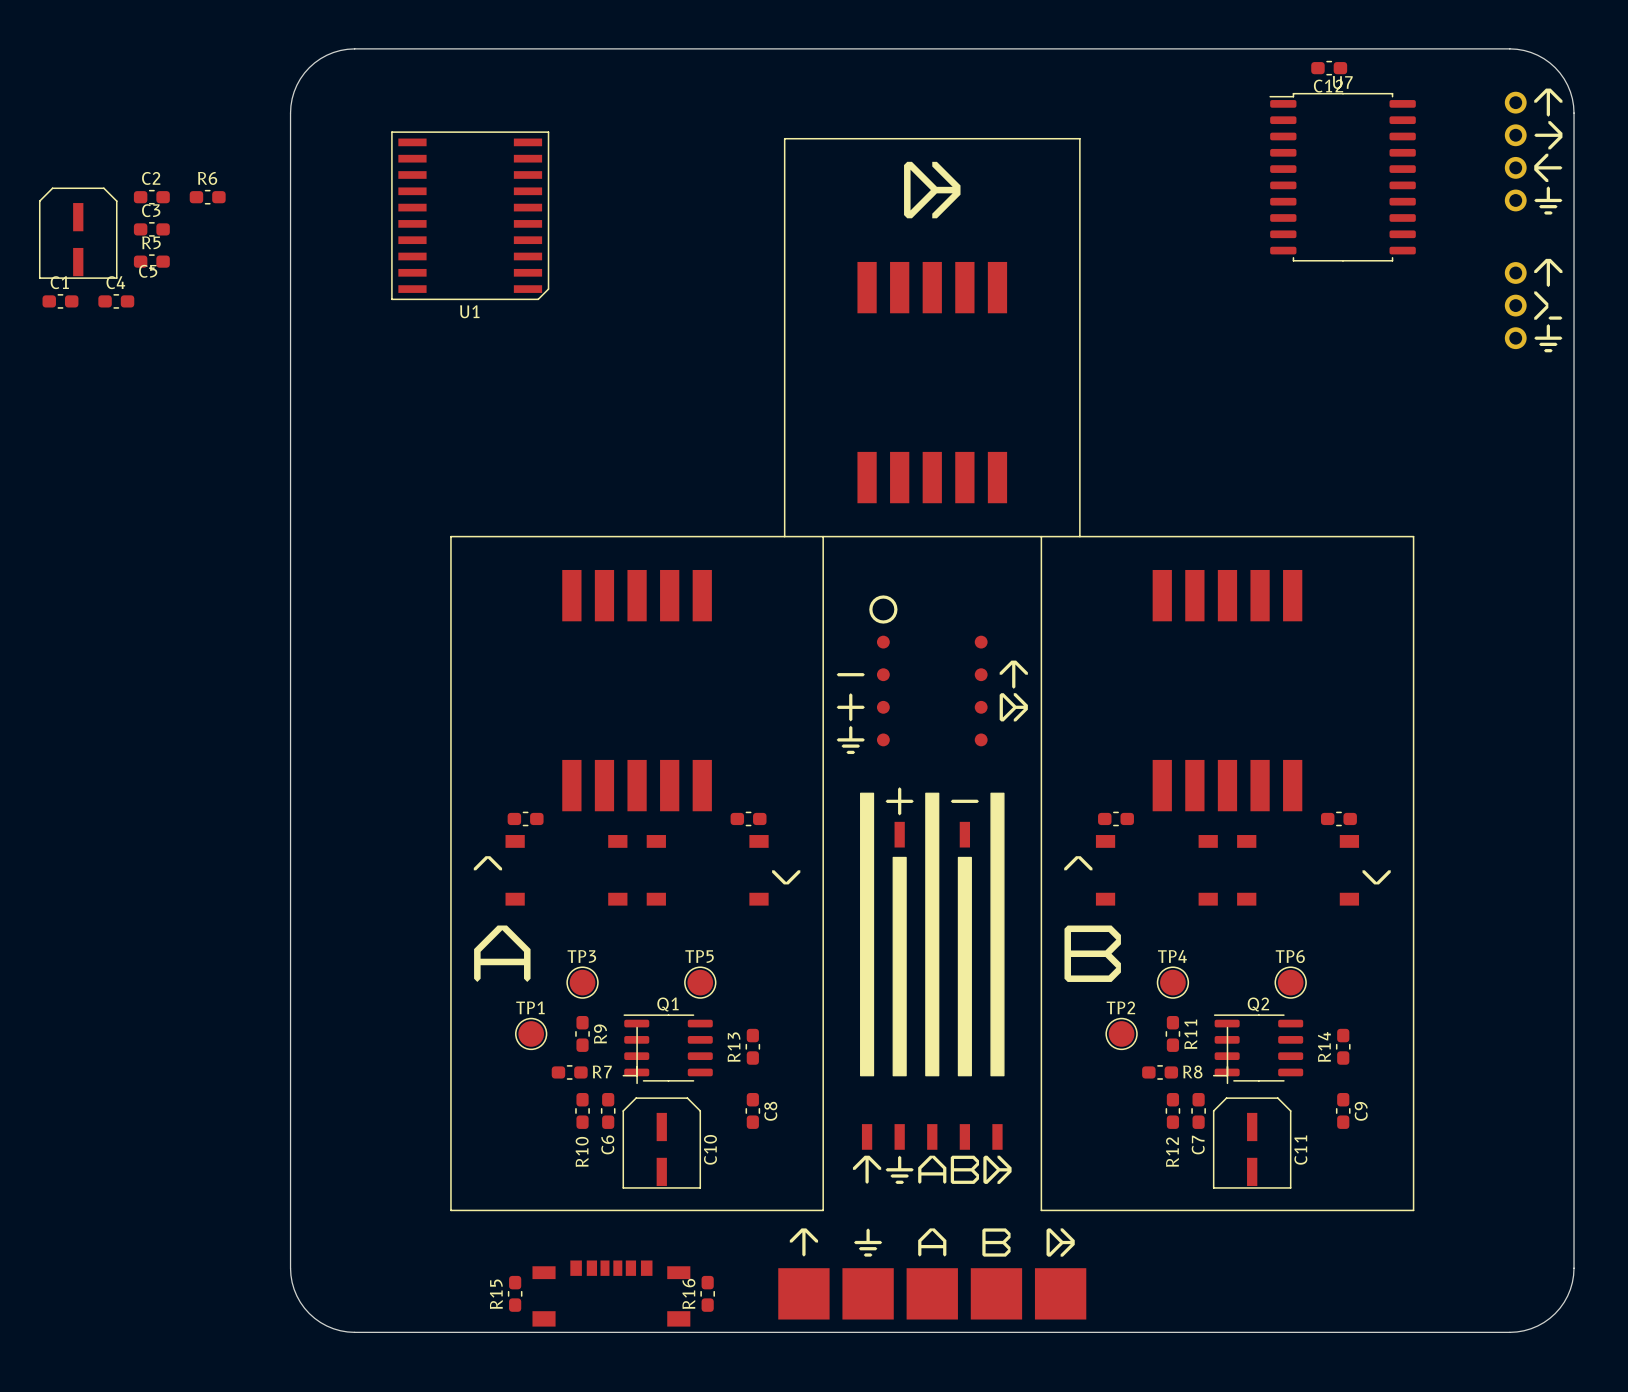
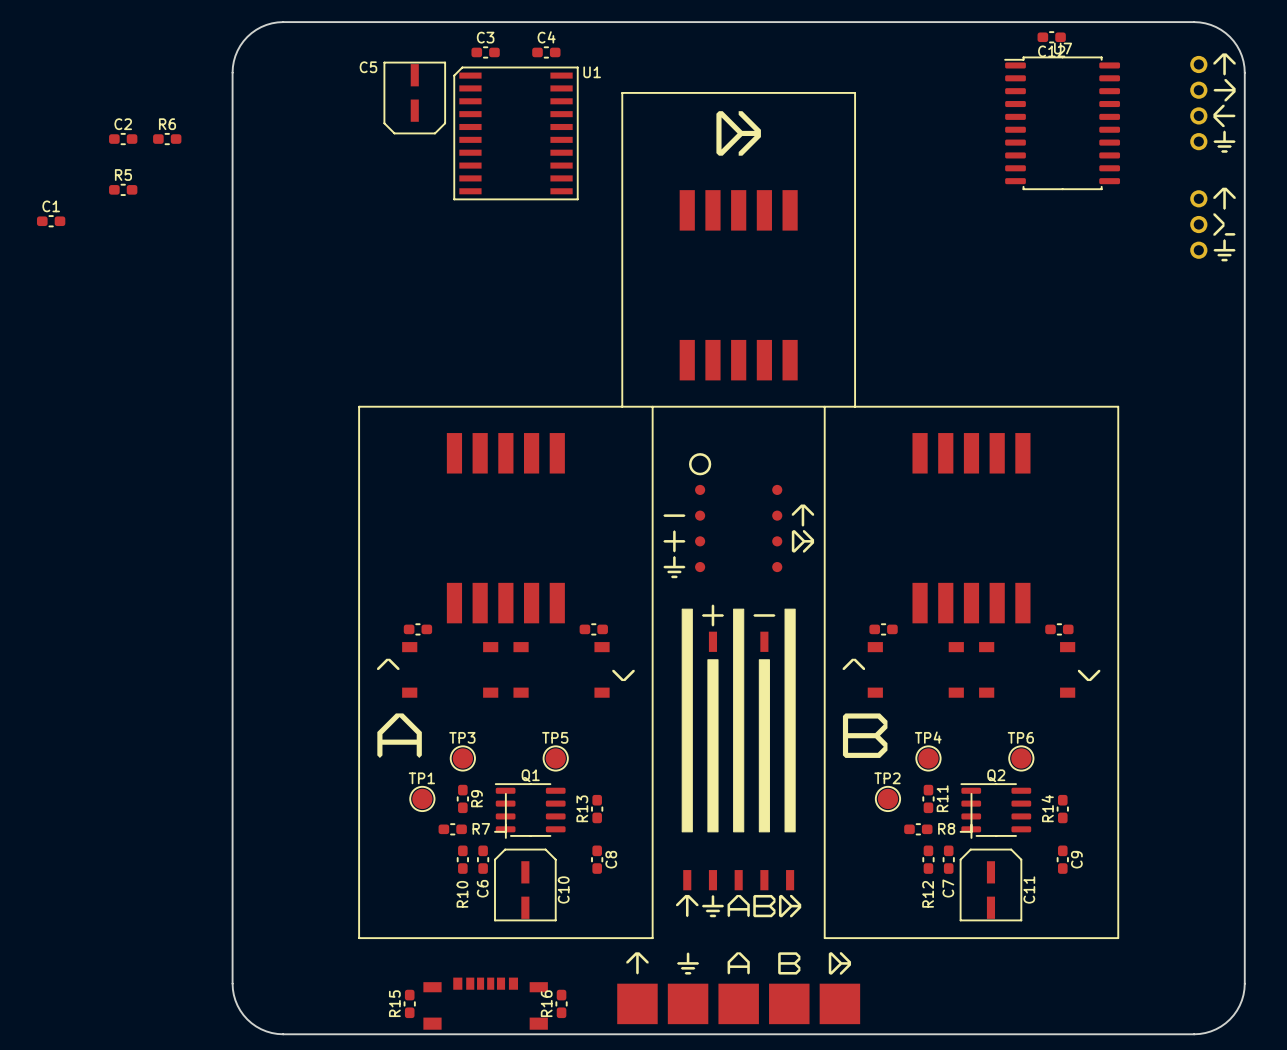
U1 rotation: 0° (470, 215) -> 180° (515, 133)
U1 position: (470, 215) -> (515, 133)
C3 position: (151, 229) -> (485, 52)
C5 rotation: 0° (78, 233) -> 180° (414, 98)
C5 position: (78, 233) -> (414, 98)
C4 position: (116, 301) -> (546, 52)
U1 name position: U1 (469, 311) -> U1 (592, 72)

